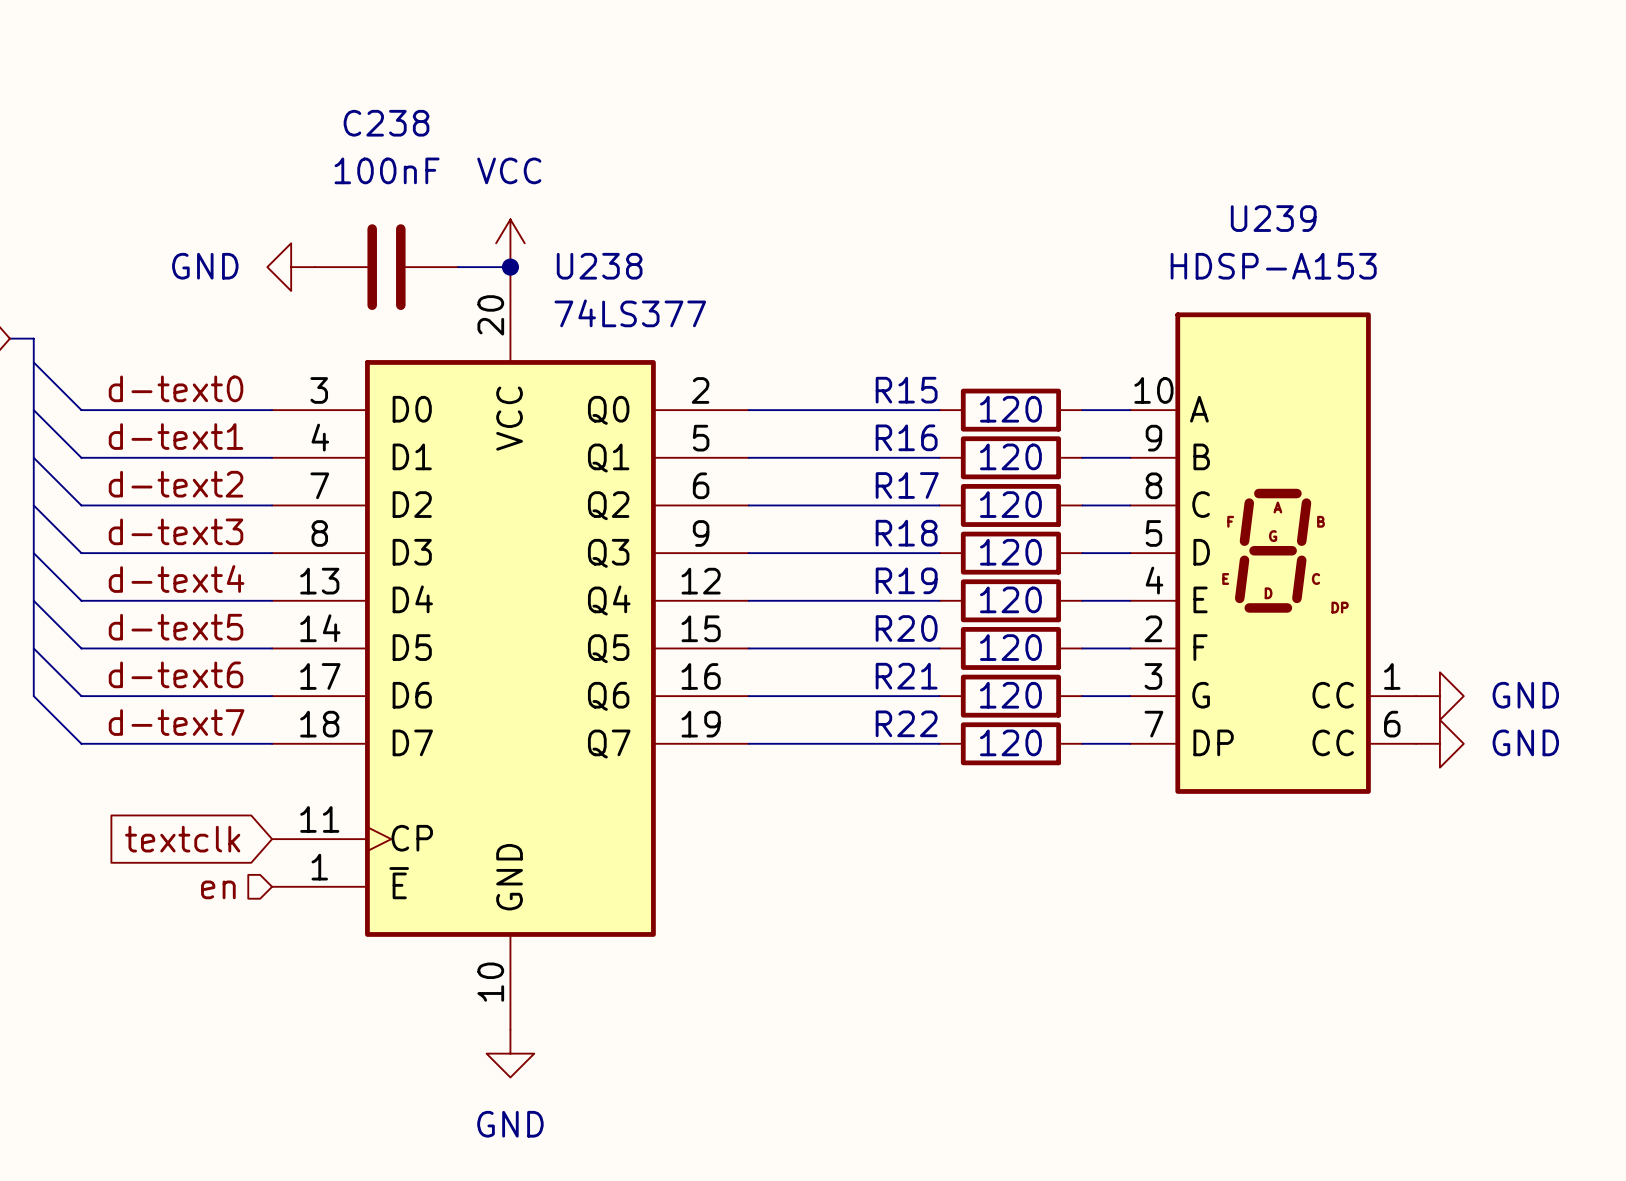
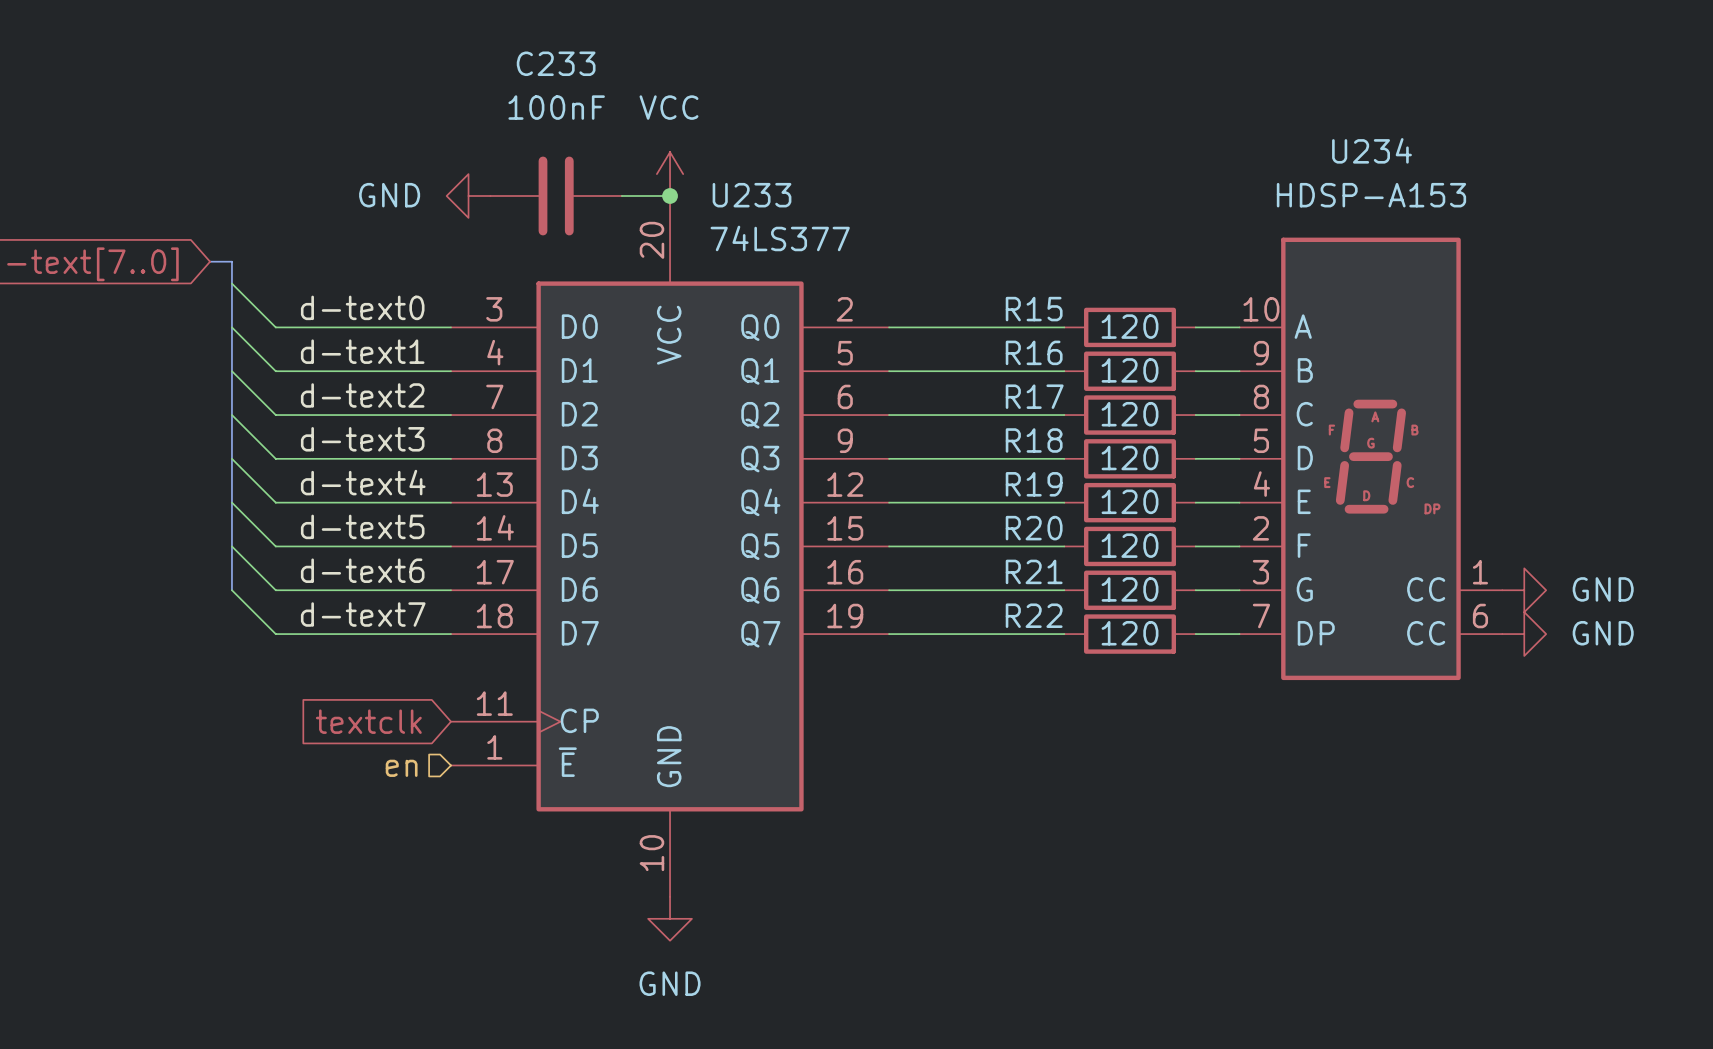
C238 name: C238 (386, 123) -> C233 (556, 63)
U239 name: U239 (1273, 218) -> U234 (1371, 150)
U238 name: U238 (599, 266) -> U233 (752, 195)

